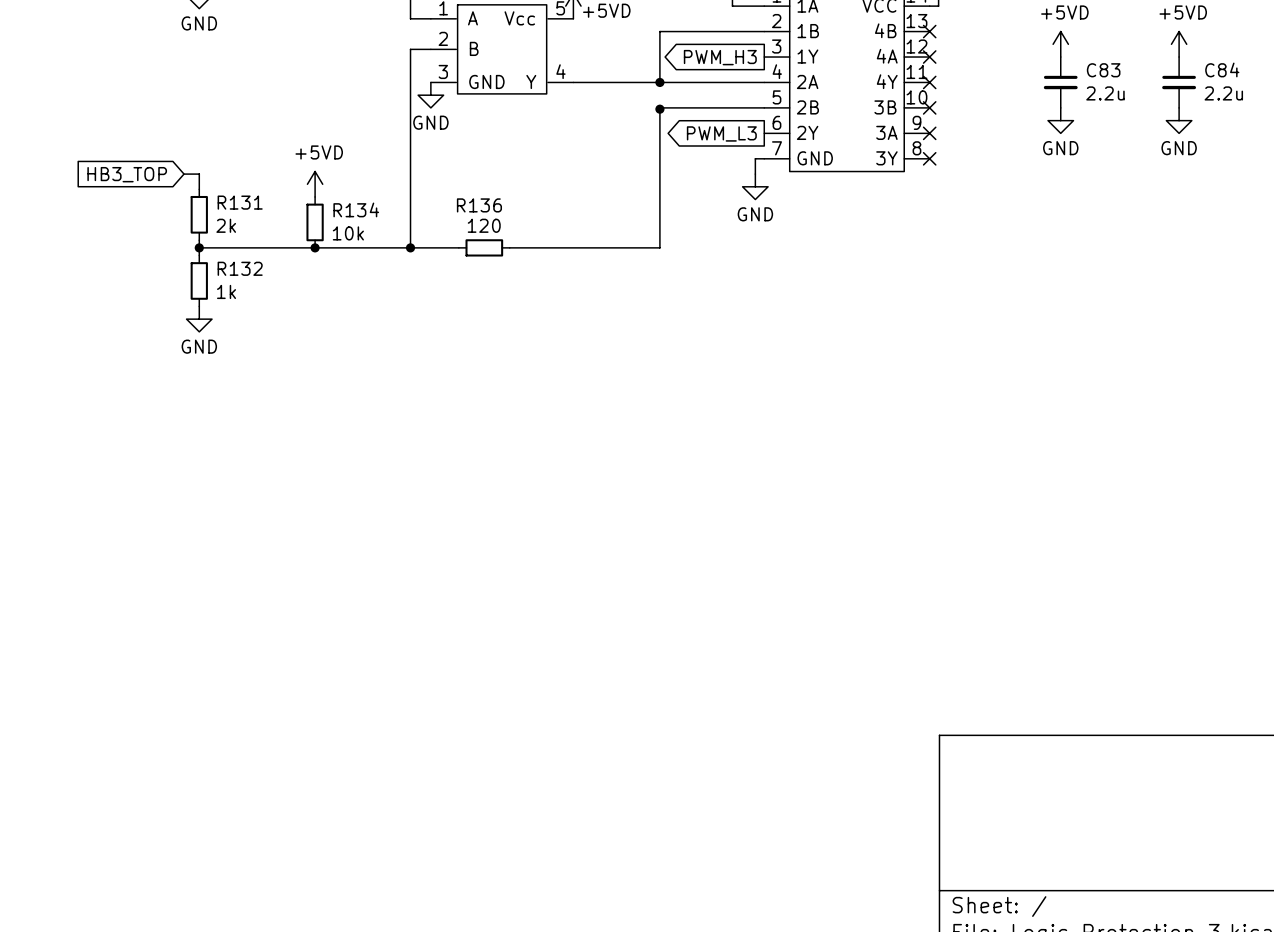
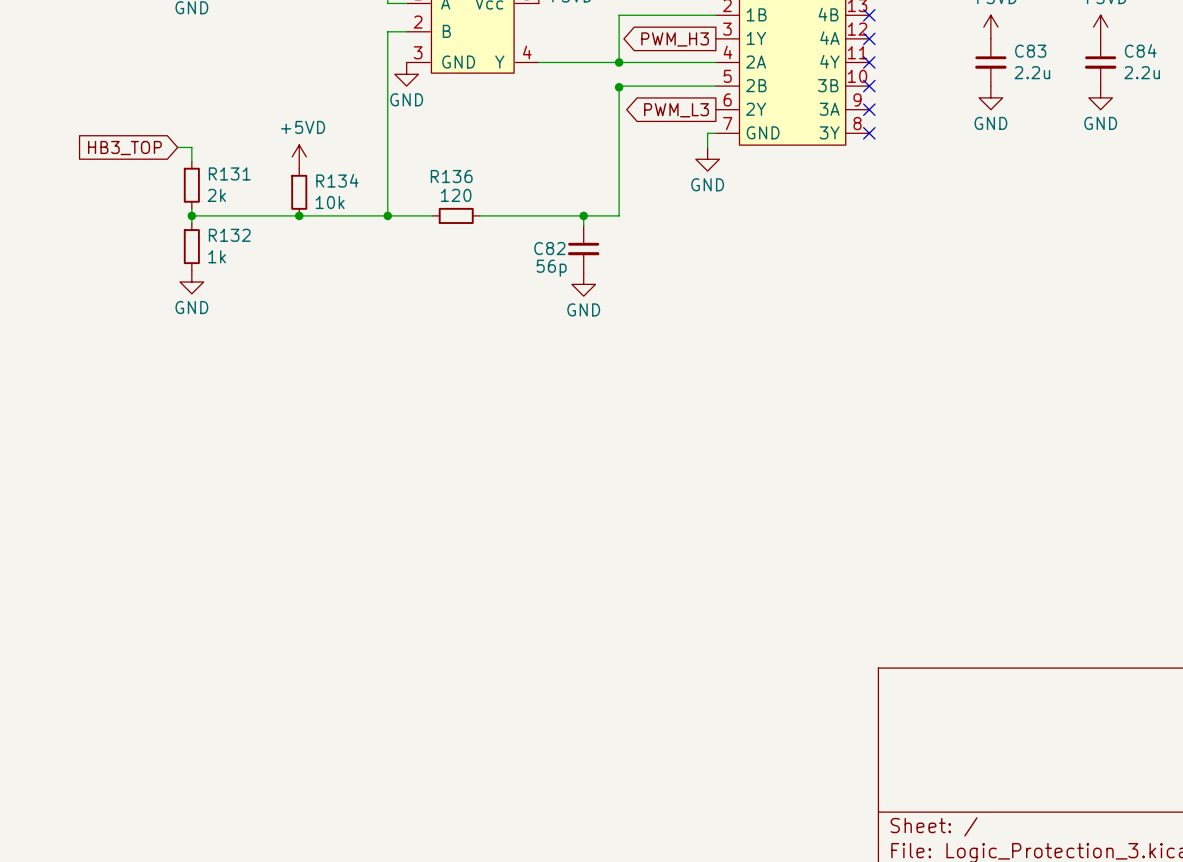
wire: none -> (583, 215) (583, 225)
junction: none -> (583, 215)
C82: none -> 56p (583, 248)
power symbol: none -> GND (583, 284)

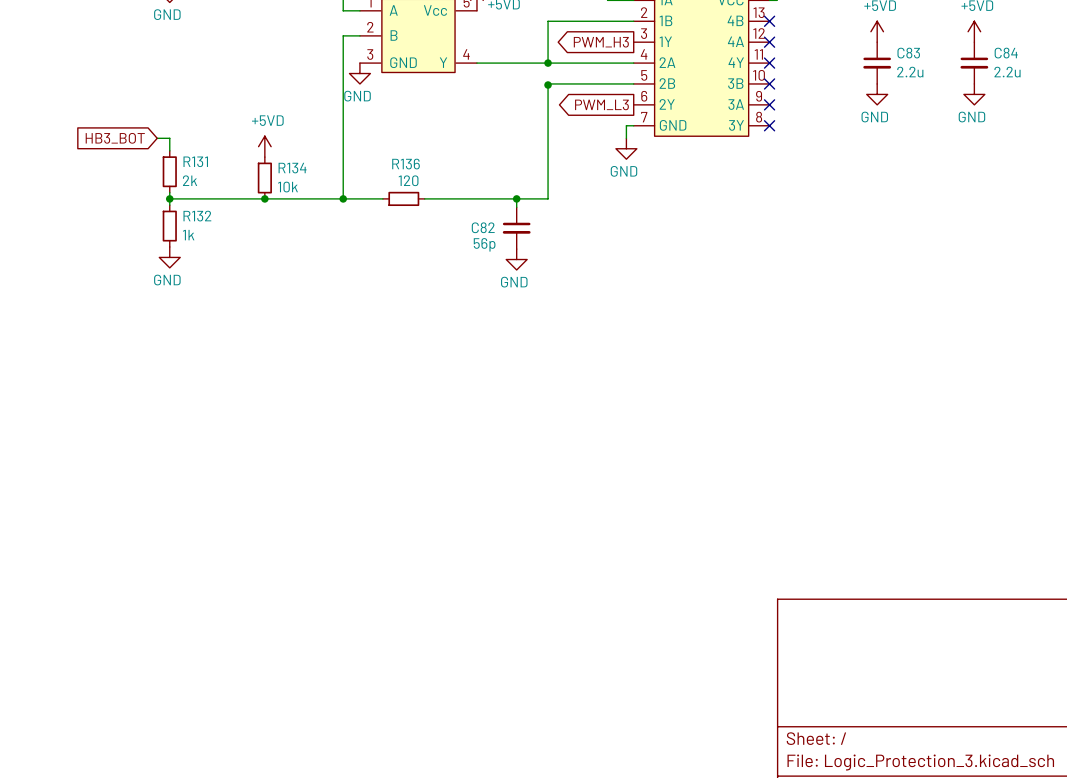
global label: HB3_TOP (124, 148) -> HB3_BOT (115, 138)

